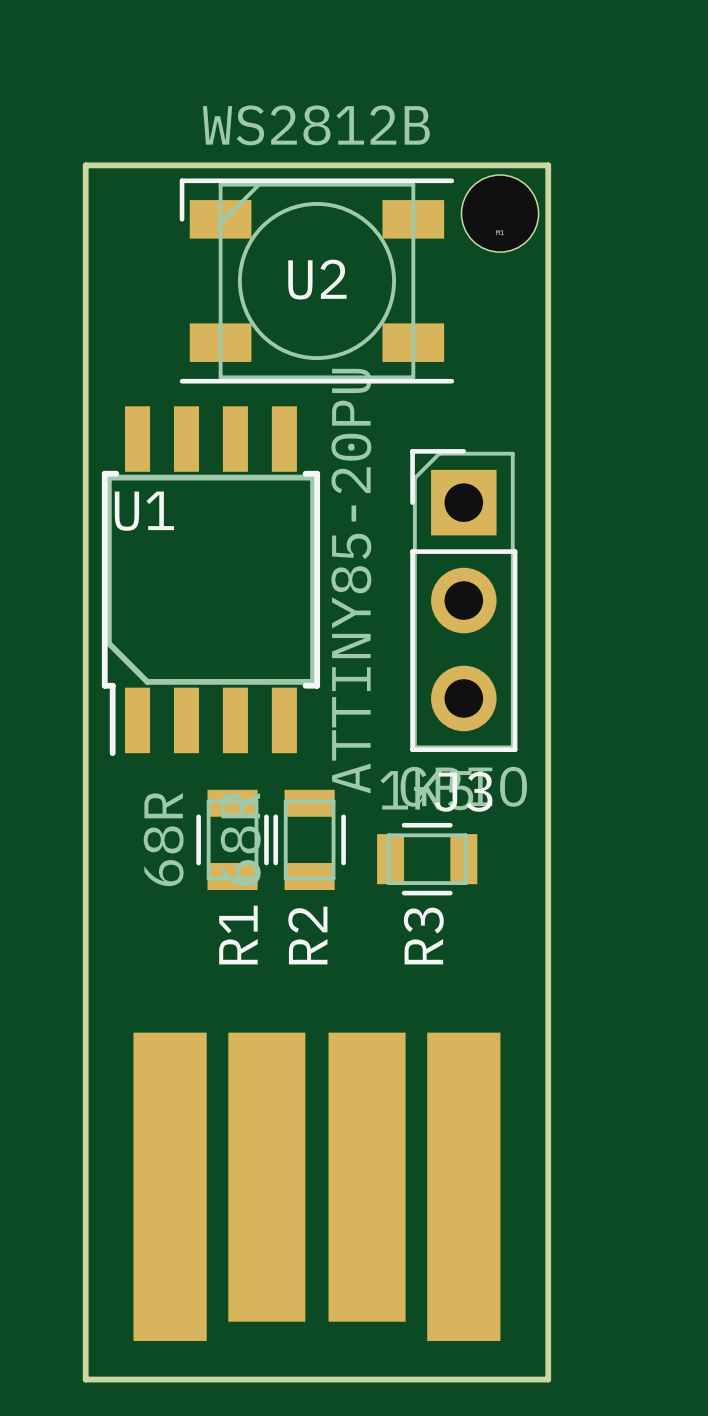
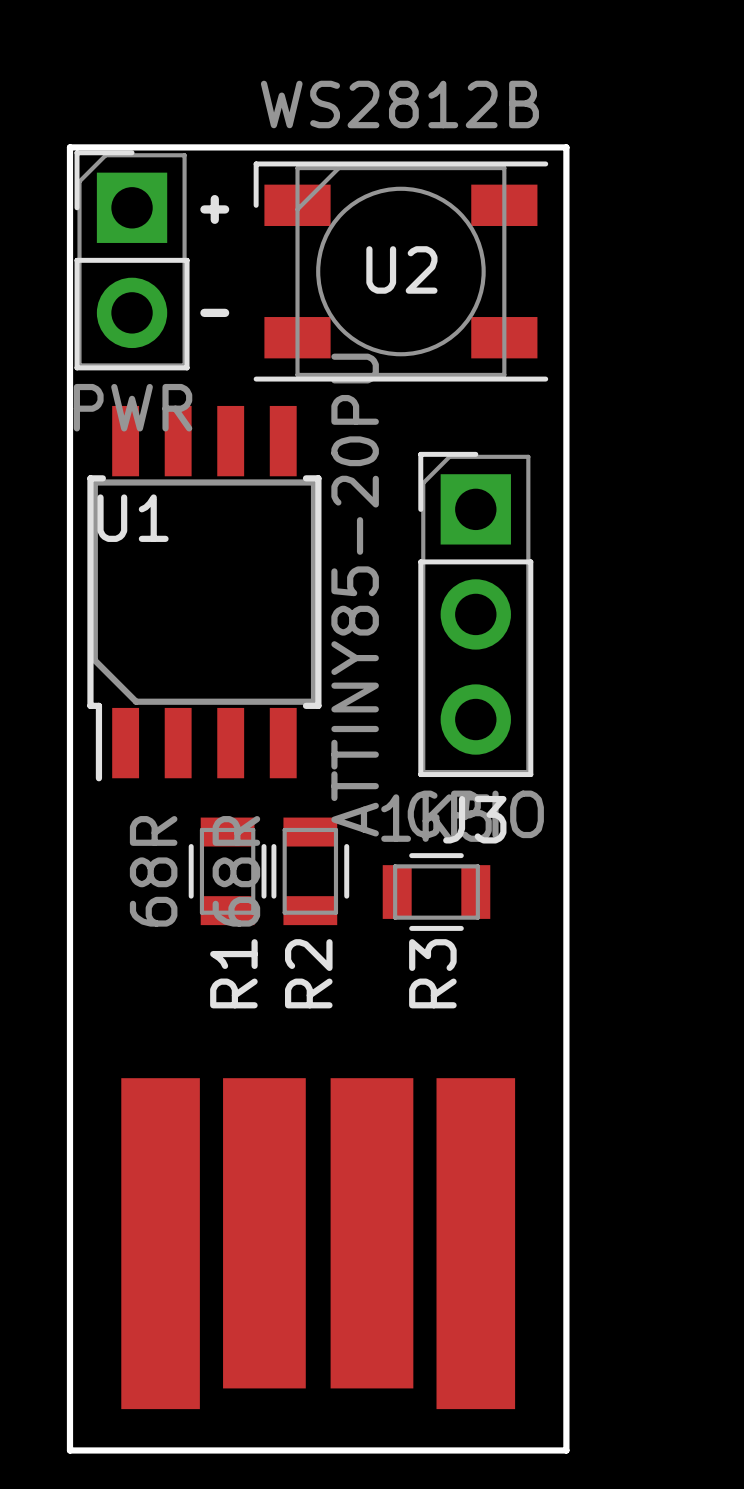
line: none -> (214, 199) (214, 219)
part: (500, 213) -> none
line: none -> (204, 209) (225, 209)
part: none -> PWR (132, 260)
U2 position: (316, 281) -> (400, 271)
line: none -> (204, 312) (225, 312)

